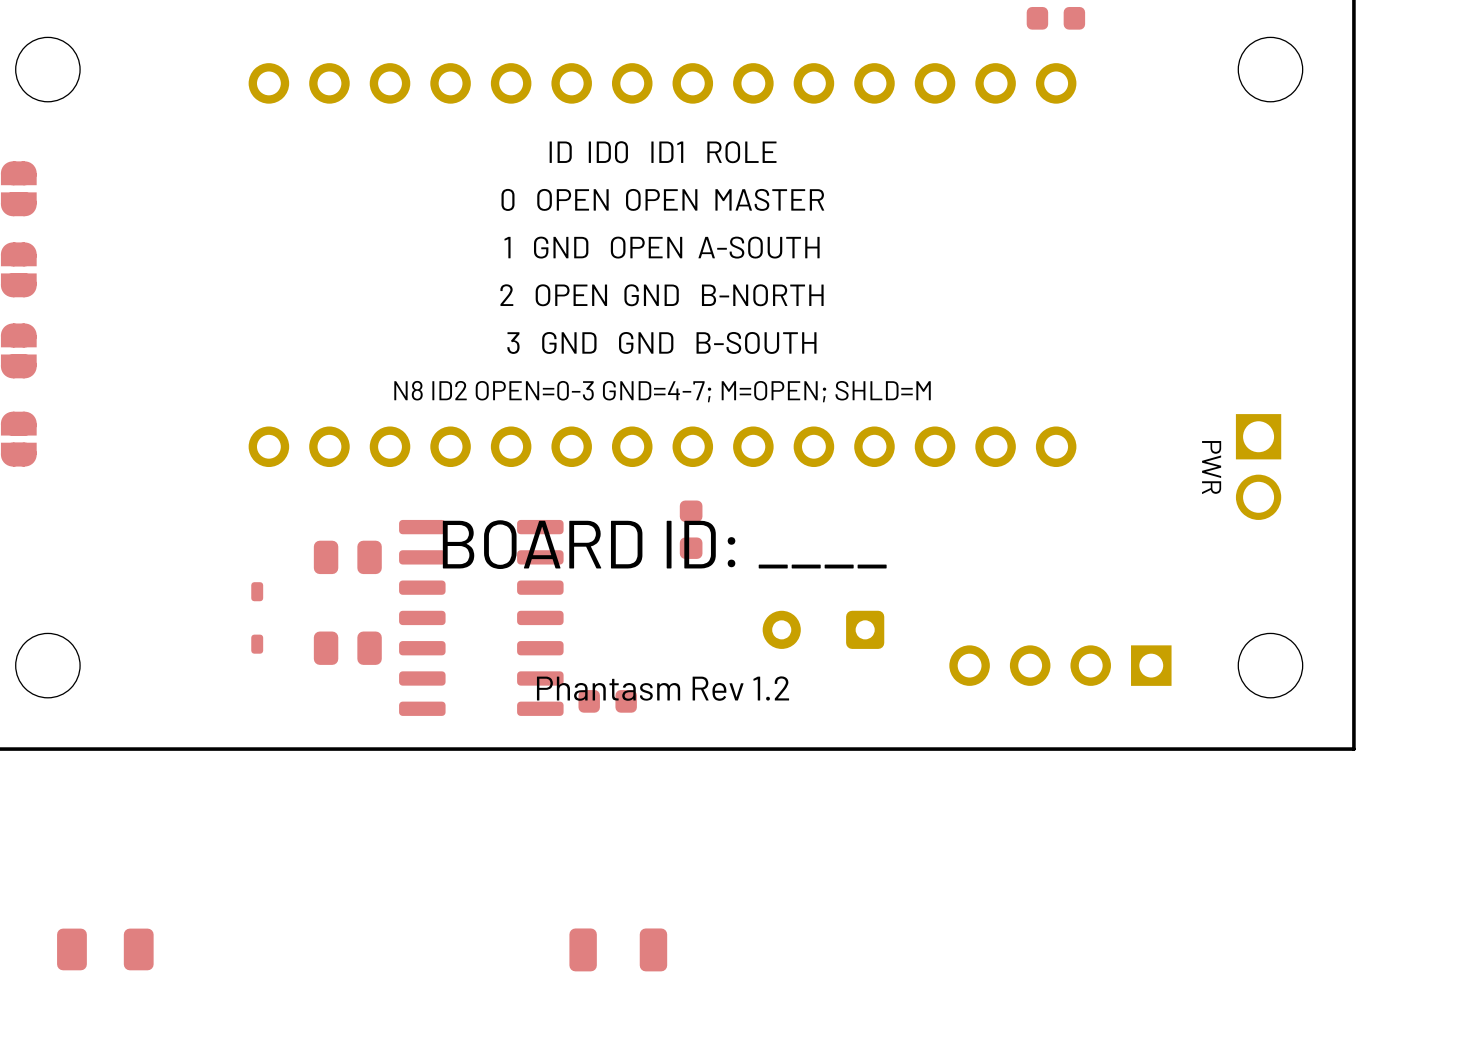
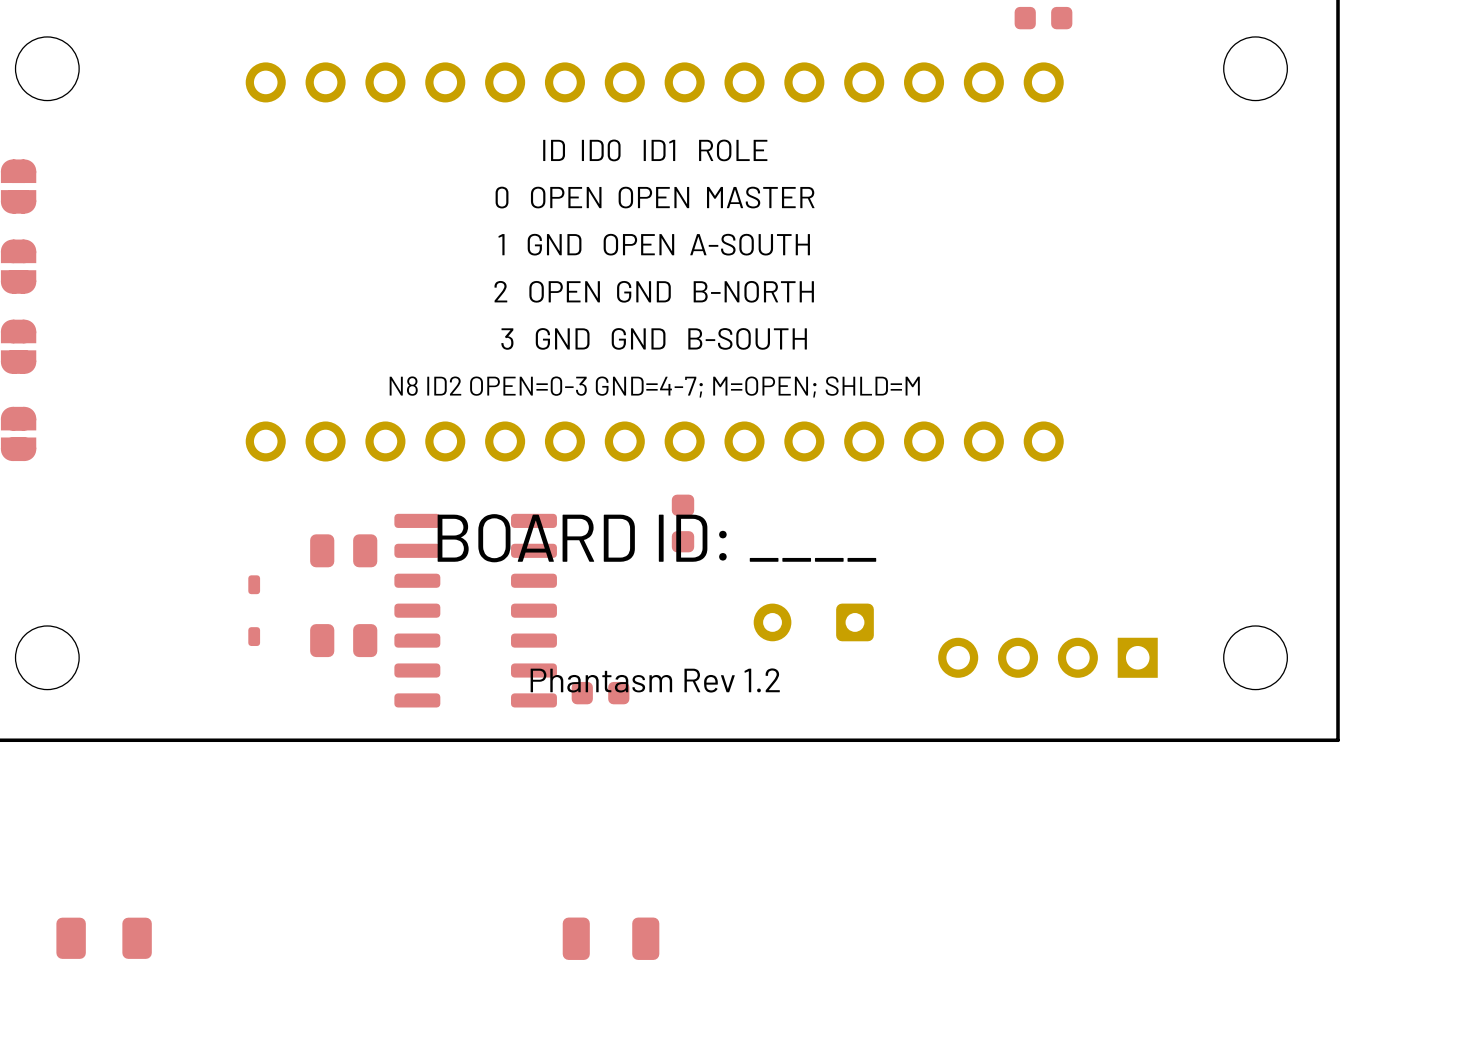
text: PWR (1211, 467) -> none
part: (1258, 467) -> none

